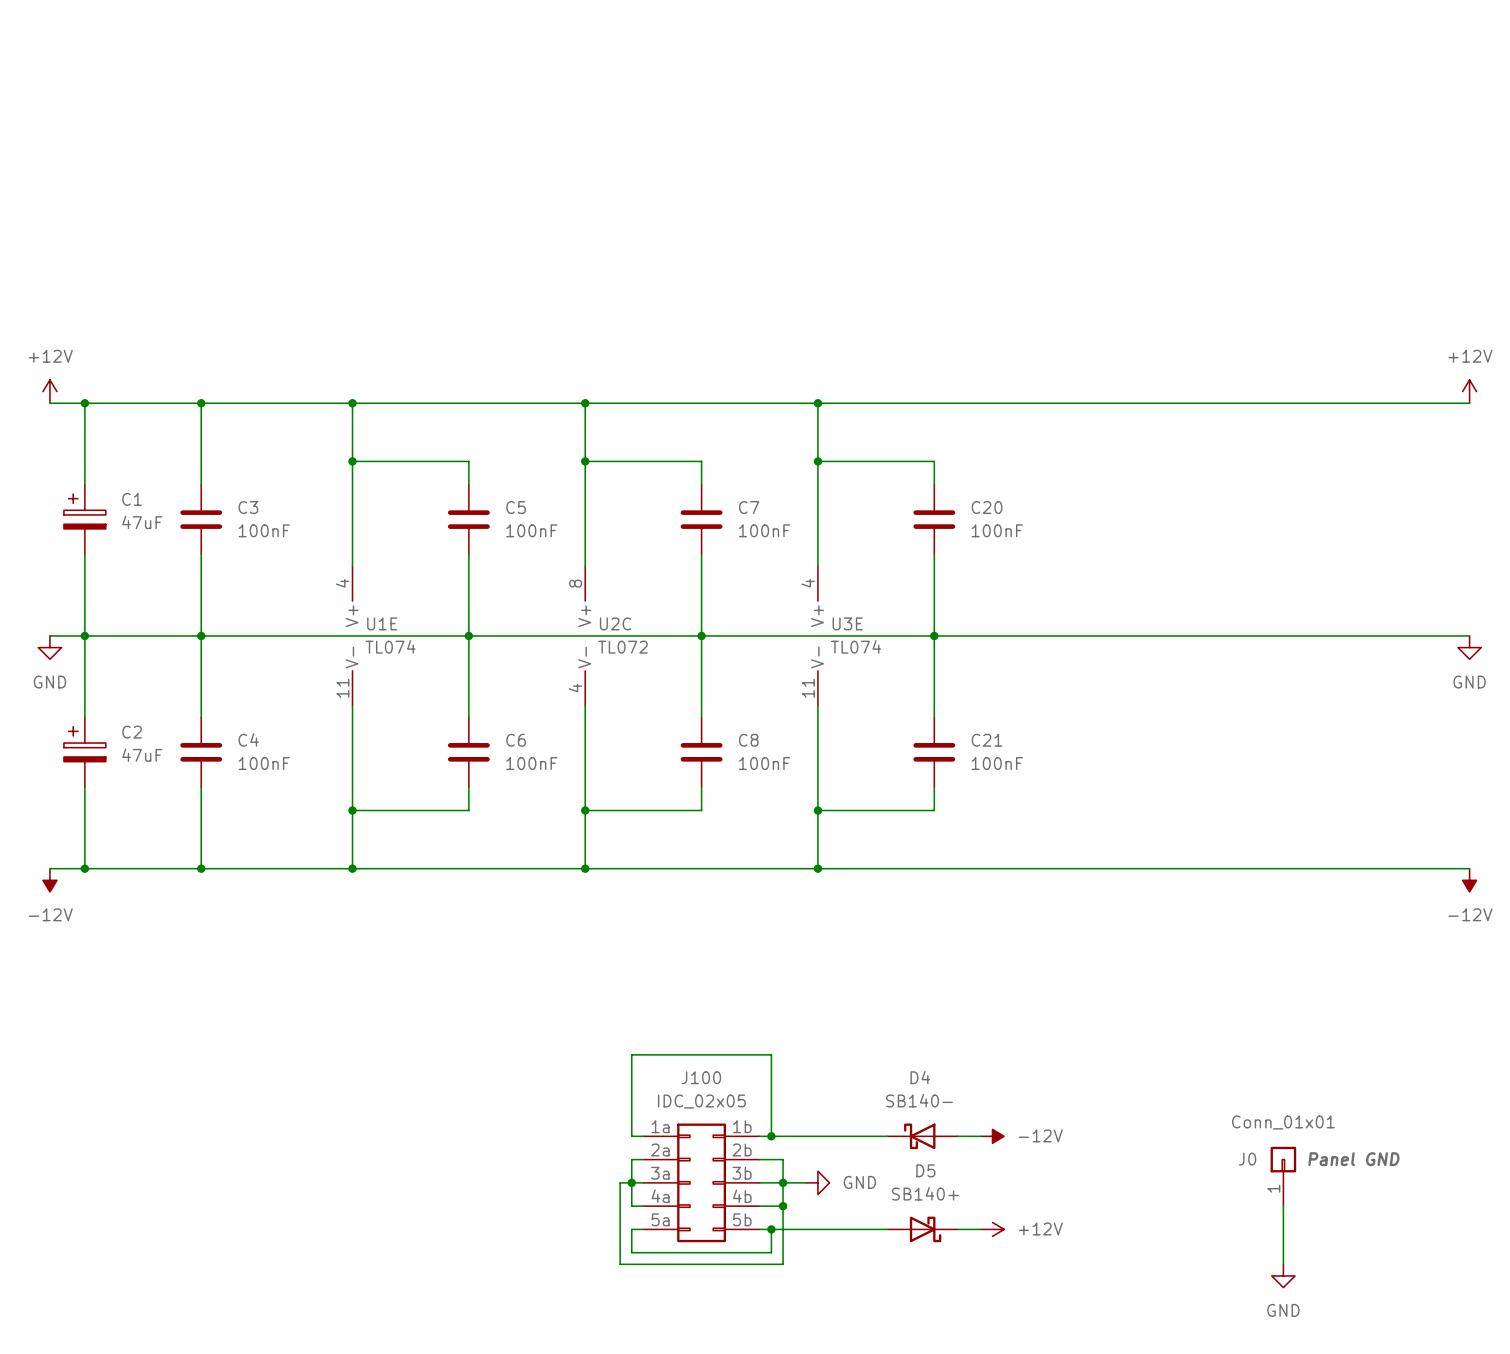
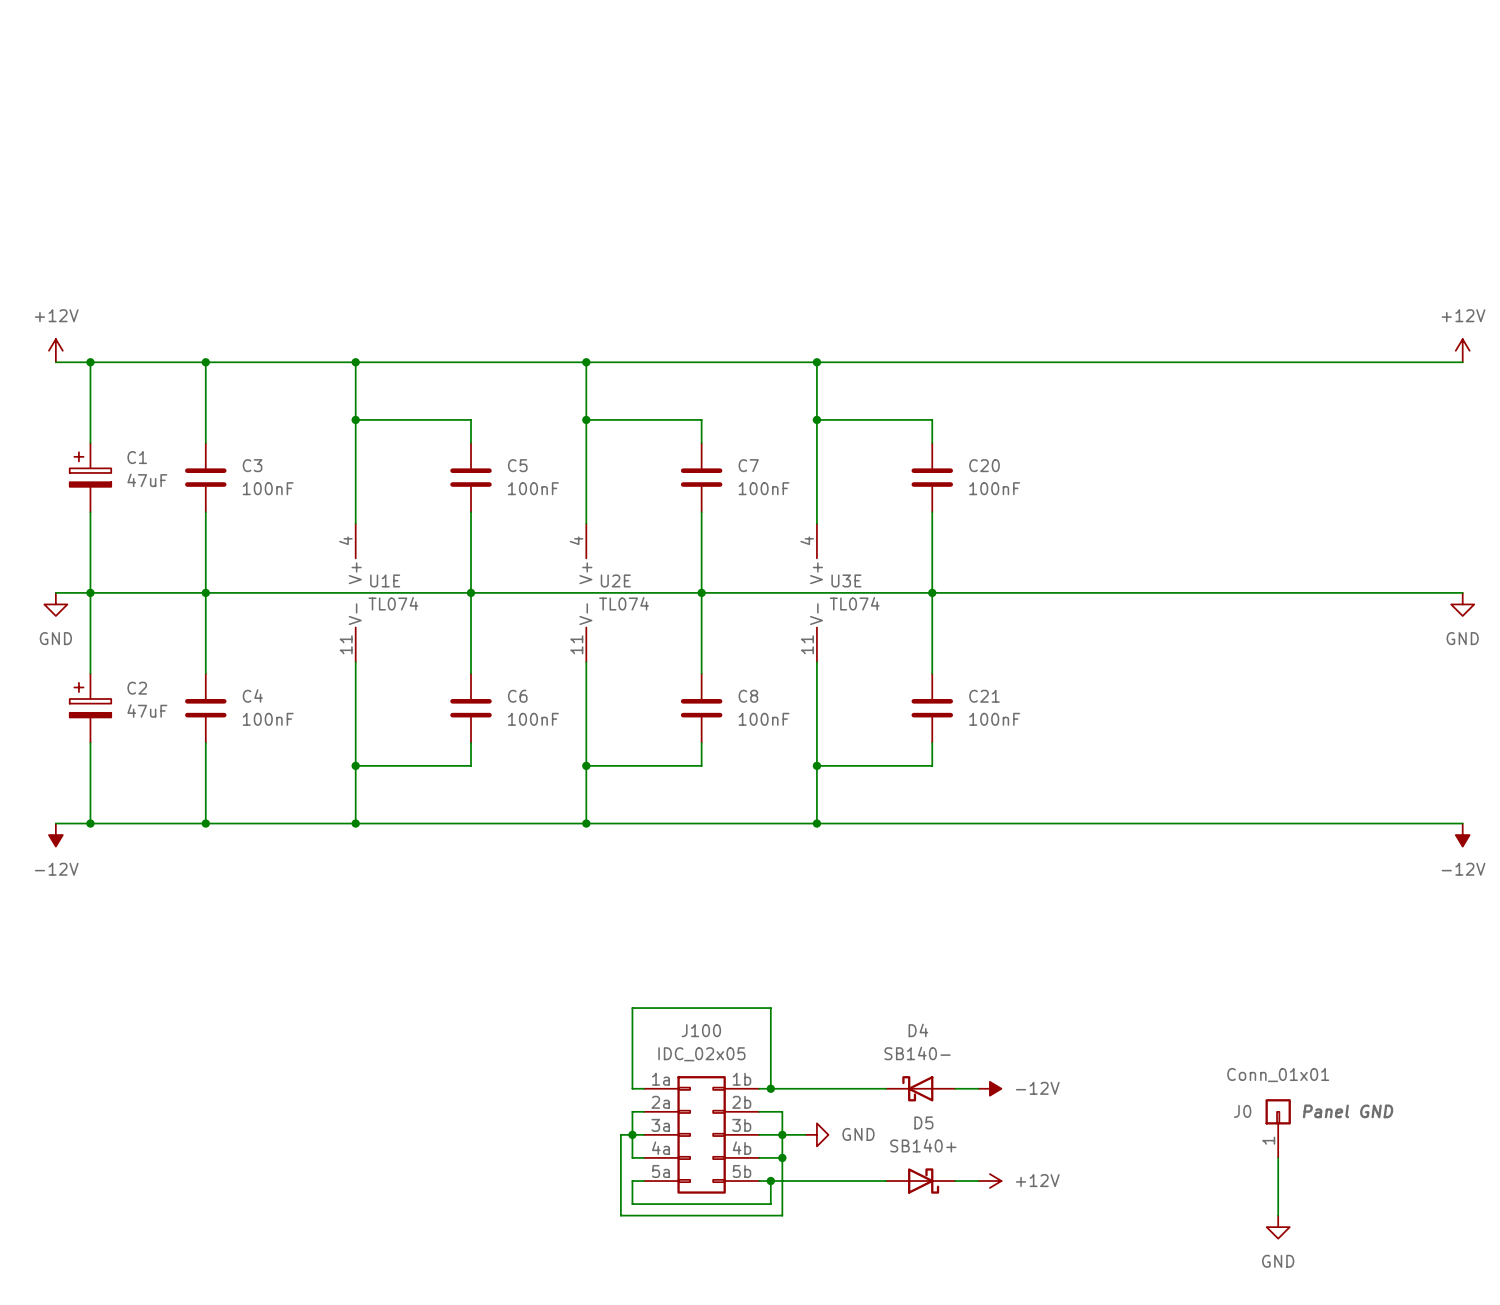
U2C pin number: 8 (575, 583) -> 4 (576, 540)
U2C name: U2C (615, 623) -> U2E (615, 580)
U2C value: TL072 (622, 647) -> TL074 (624, 603)
U2C pin number: 4 (575, 688) -> 11 (576, 644)

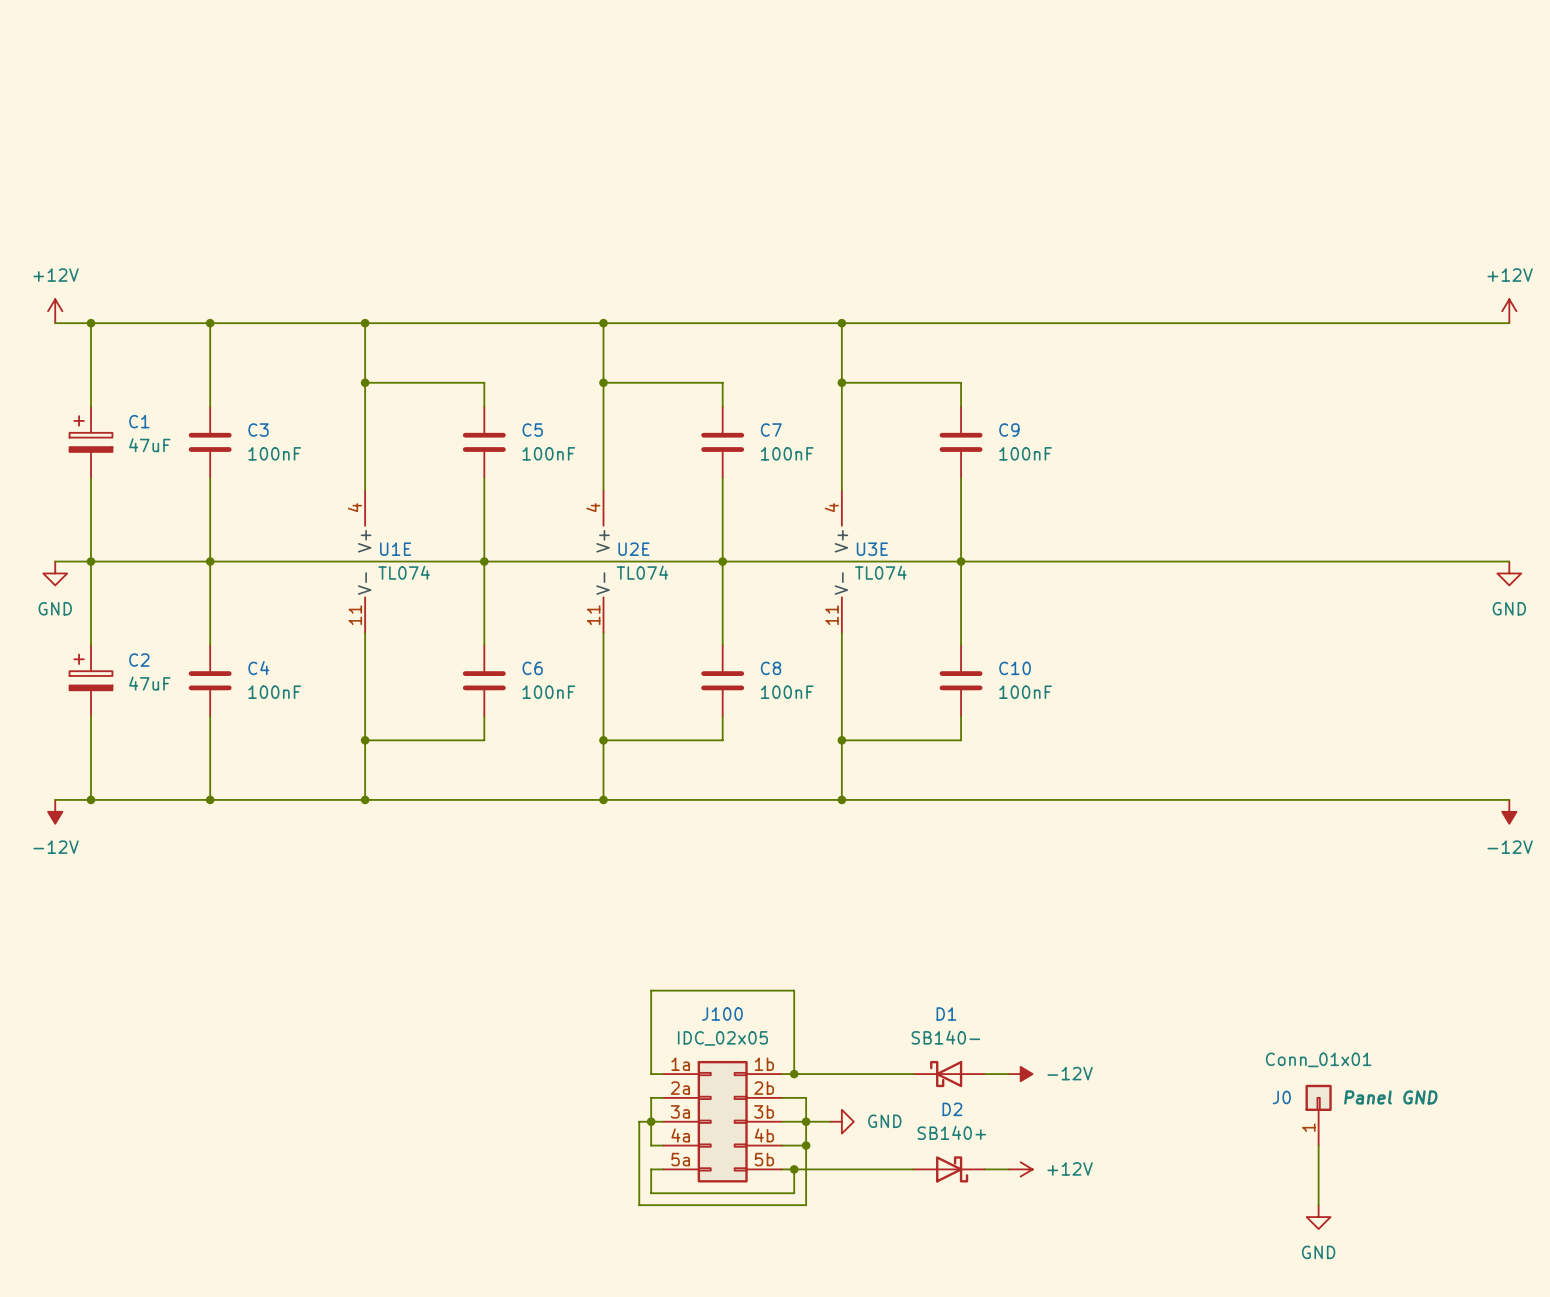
C20 name: C20 (984, 465) -> C9 (1009, 430)
C21 name: C21 (984, 696) -> C10 (1015, 668)
D4 name: D4 (918, 1030) -> D1 (946, 1014)
D5 name: D5 (923, 1122) -> D2 (952, 1109)

